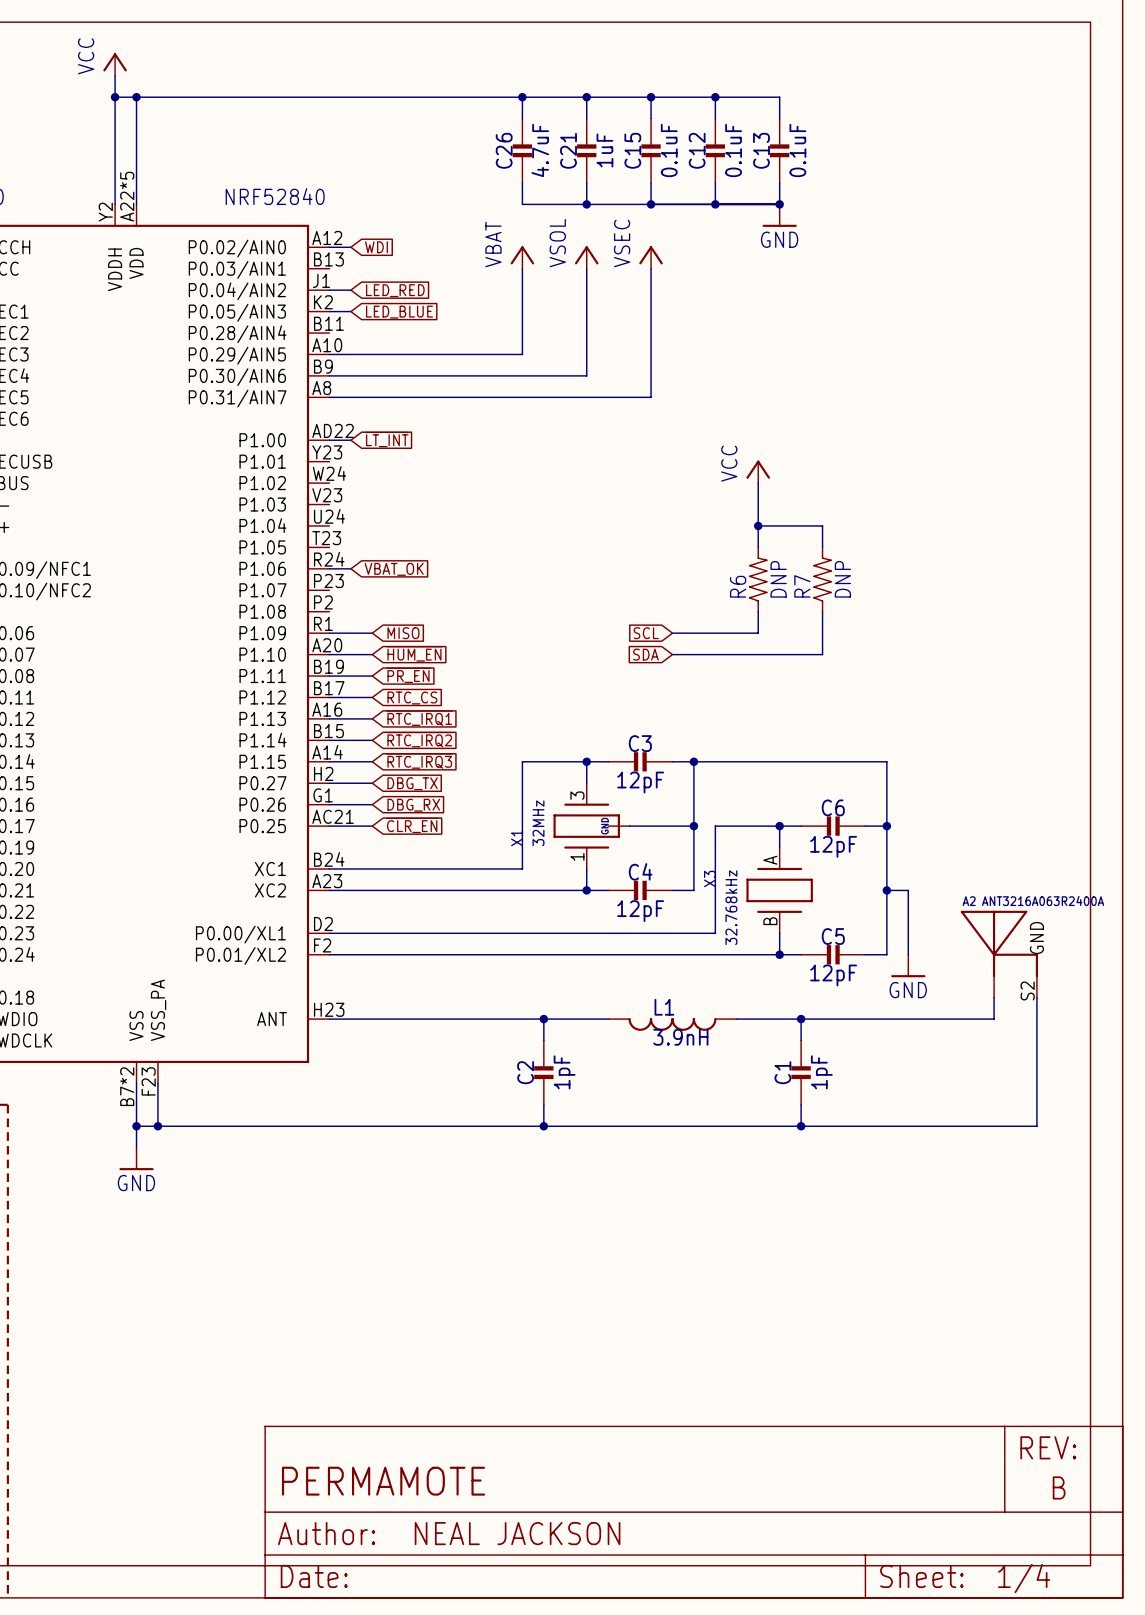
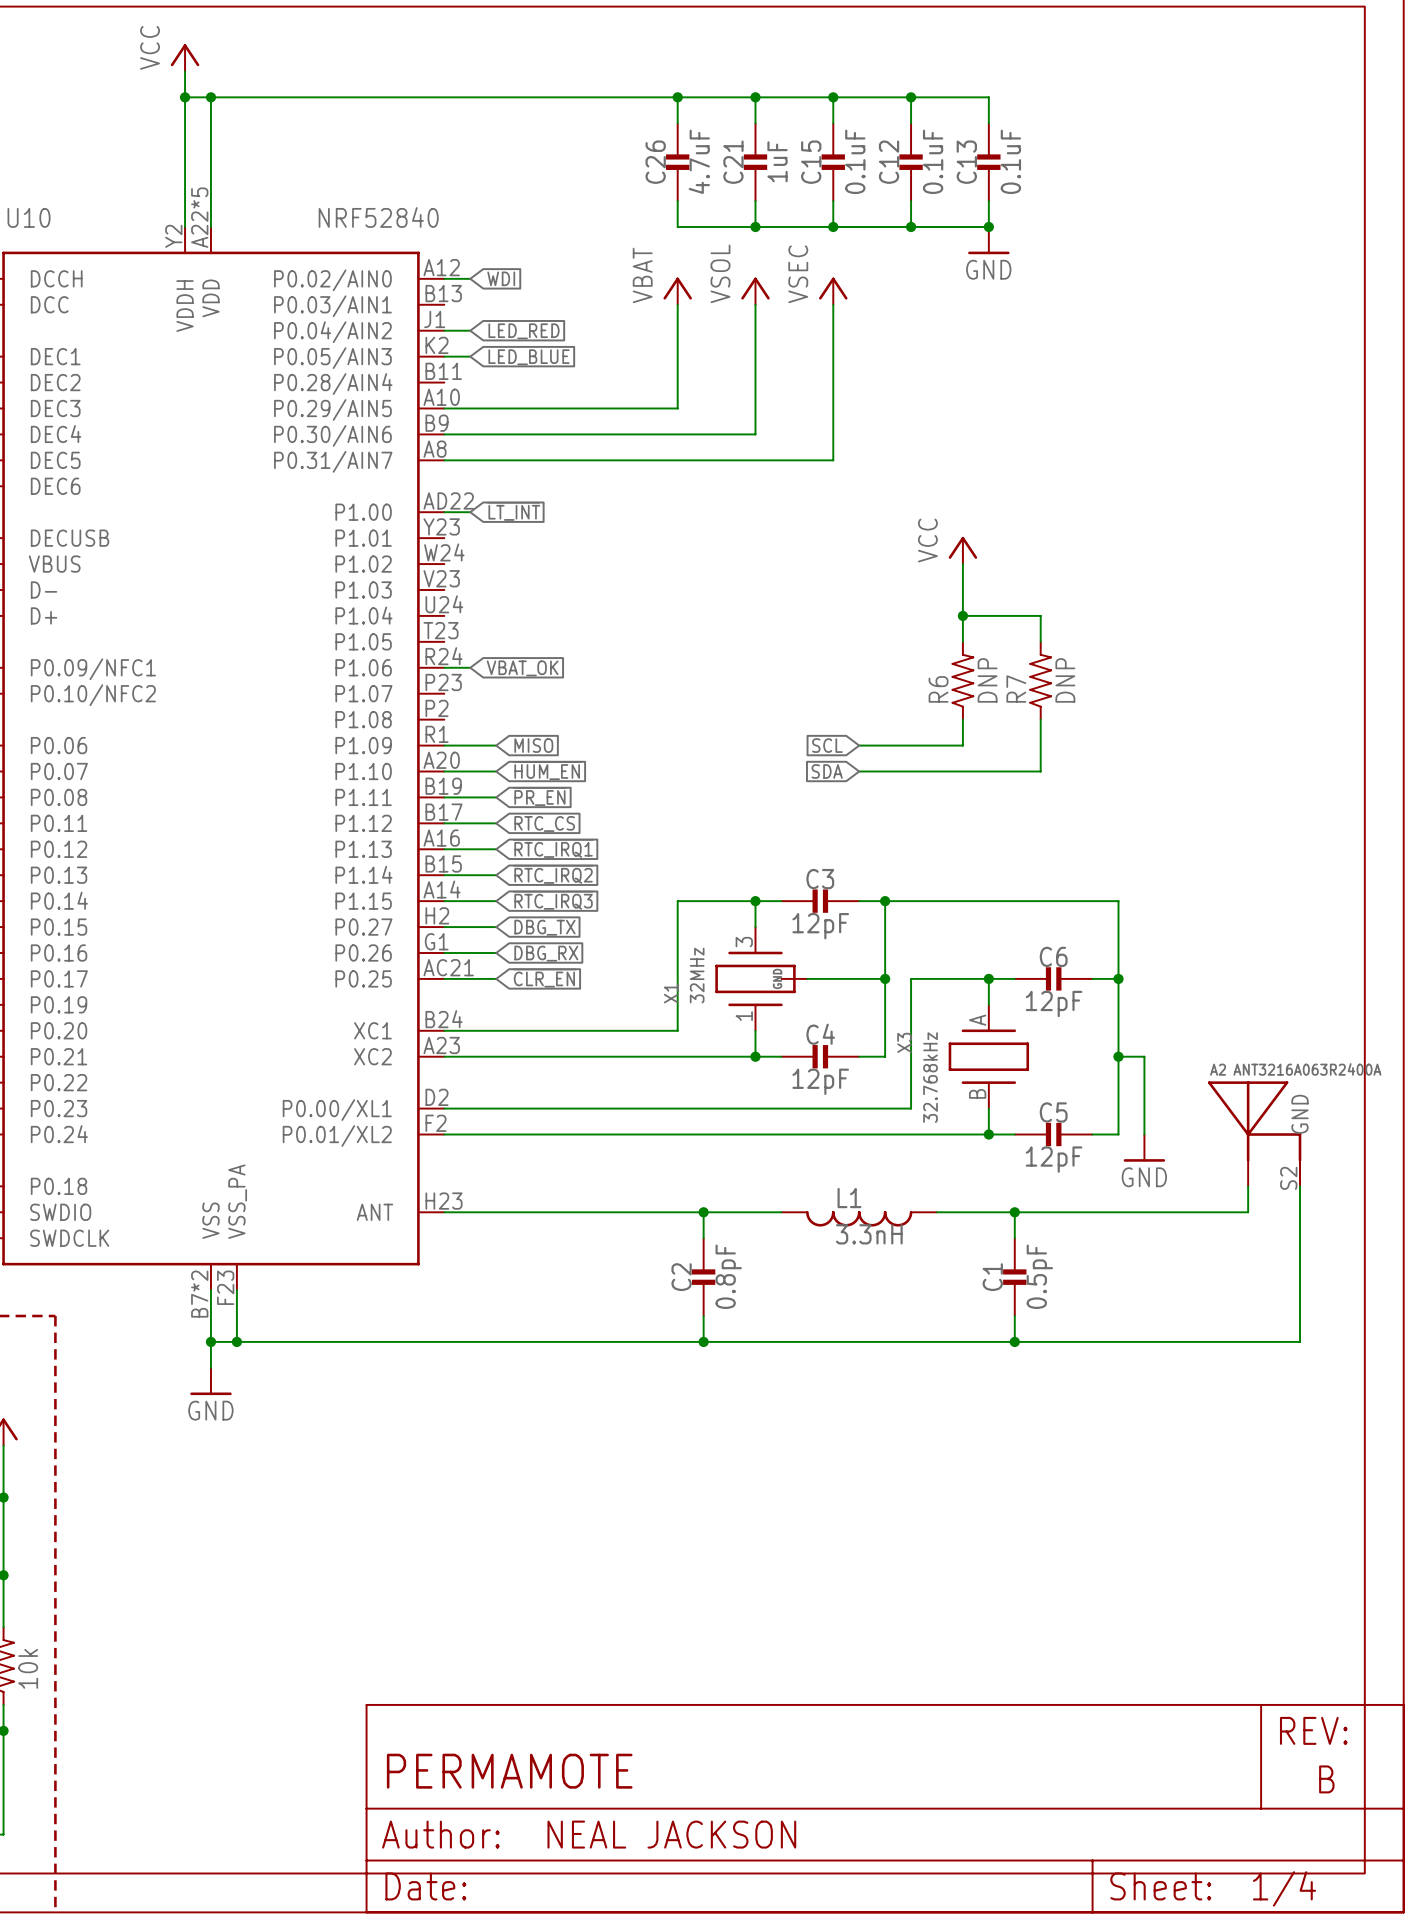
L1 value: 3.9nH (680, 1037) -> 3.3nH (869, 1234)
C2 value: 1pF (564, 1072) -> 0.8pF (728, 1276)
C1 value: 1pF (821, 1072) -> 0.5pF (1039, 1276)

